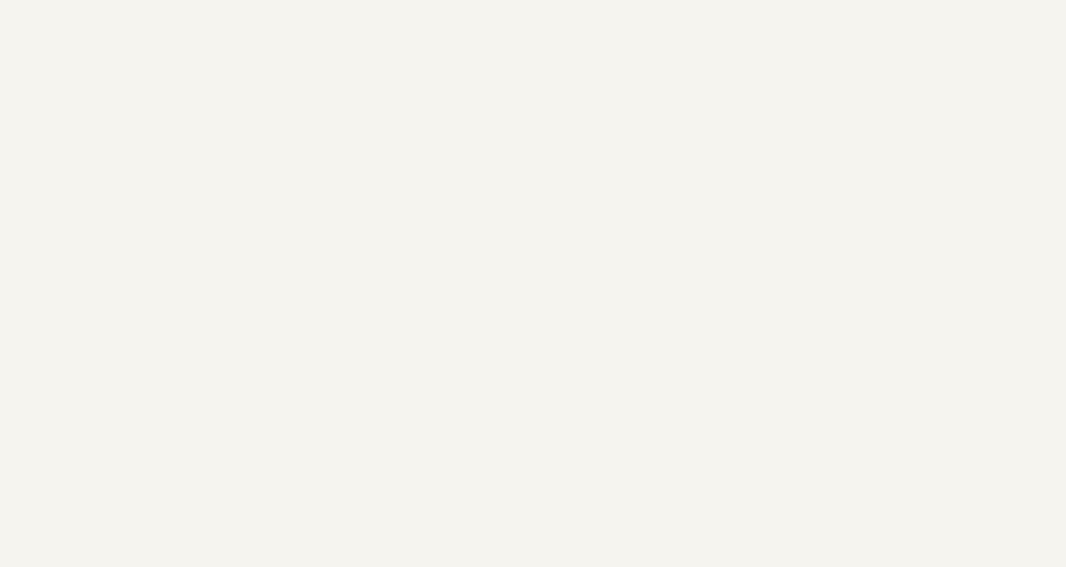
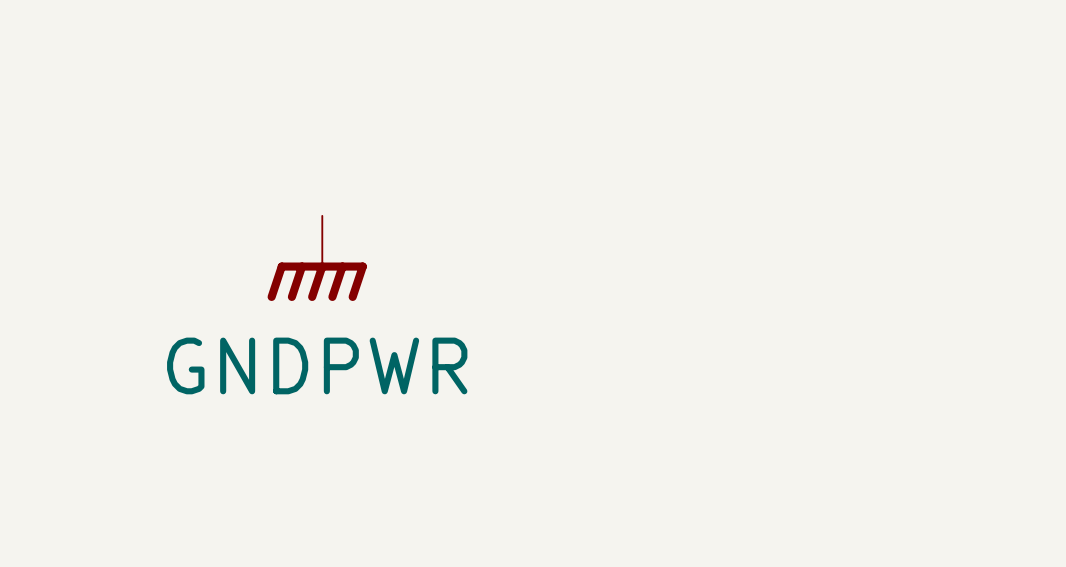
power symbol: none -> GNDPWR (317, 258)

